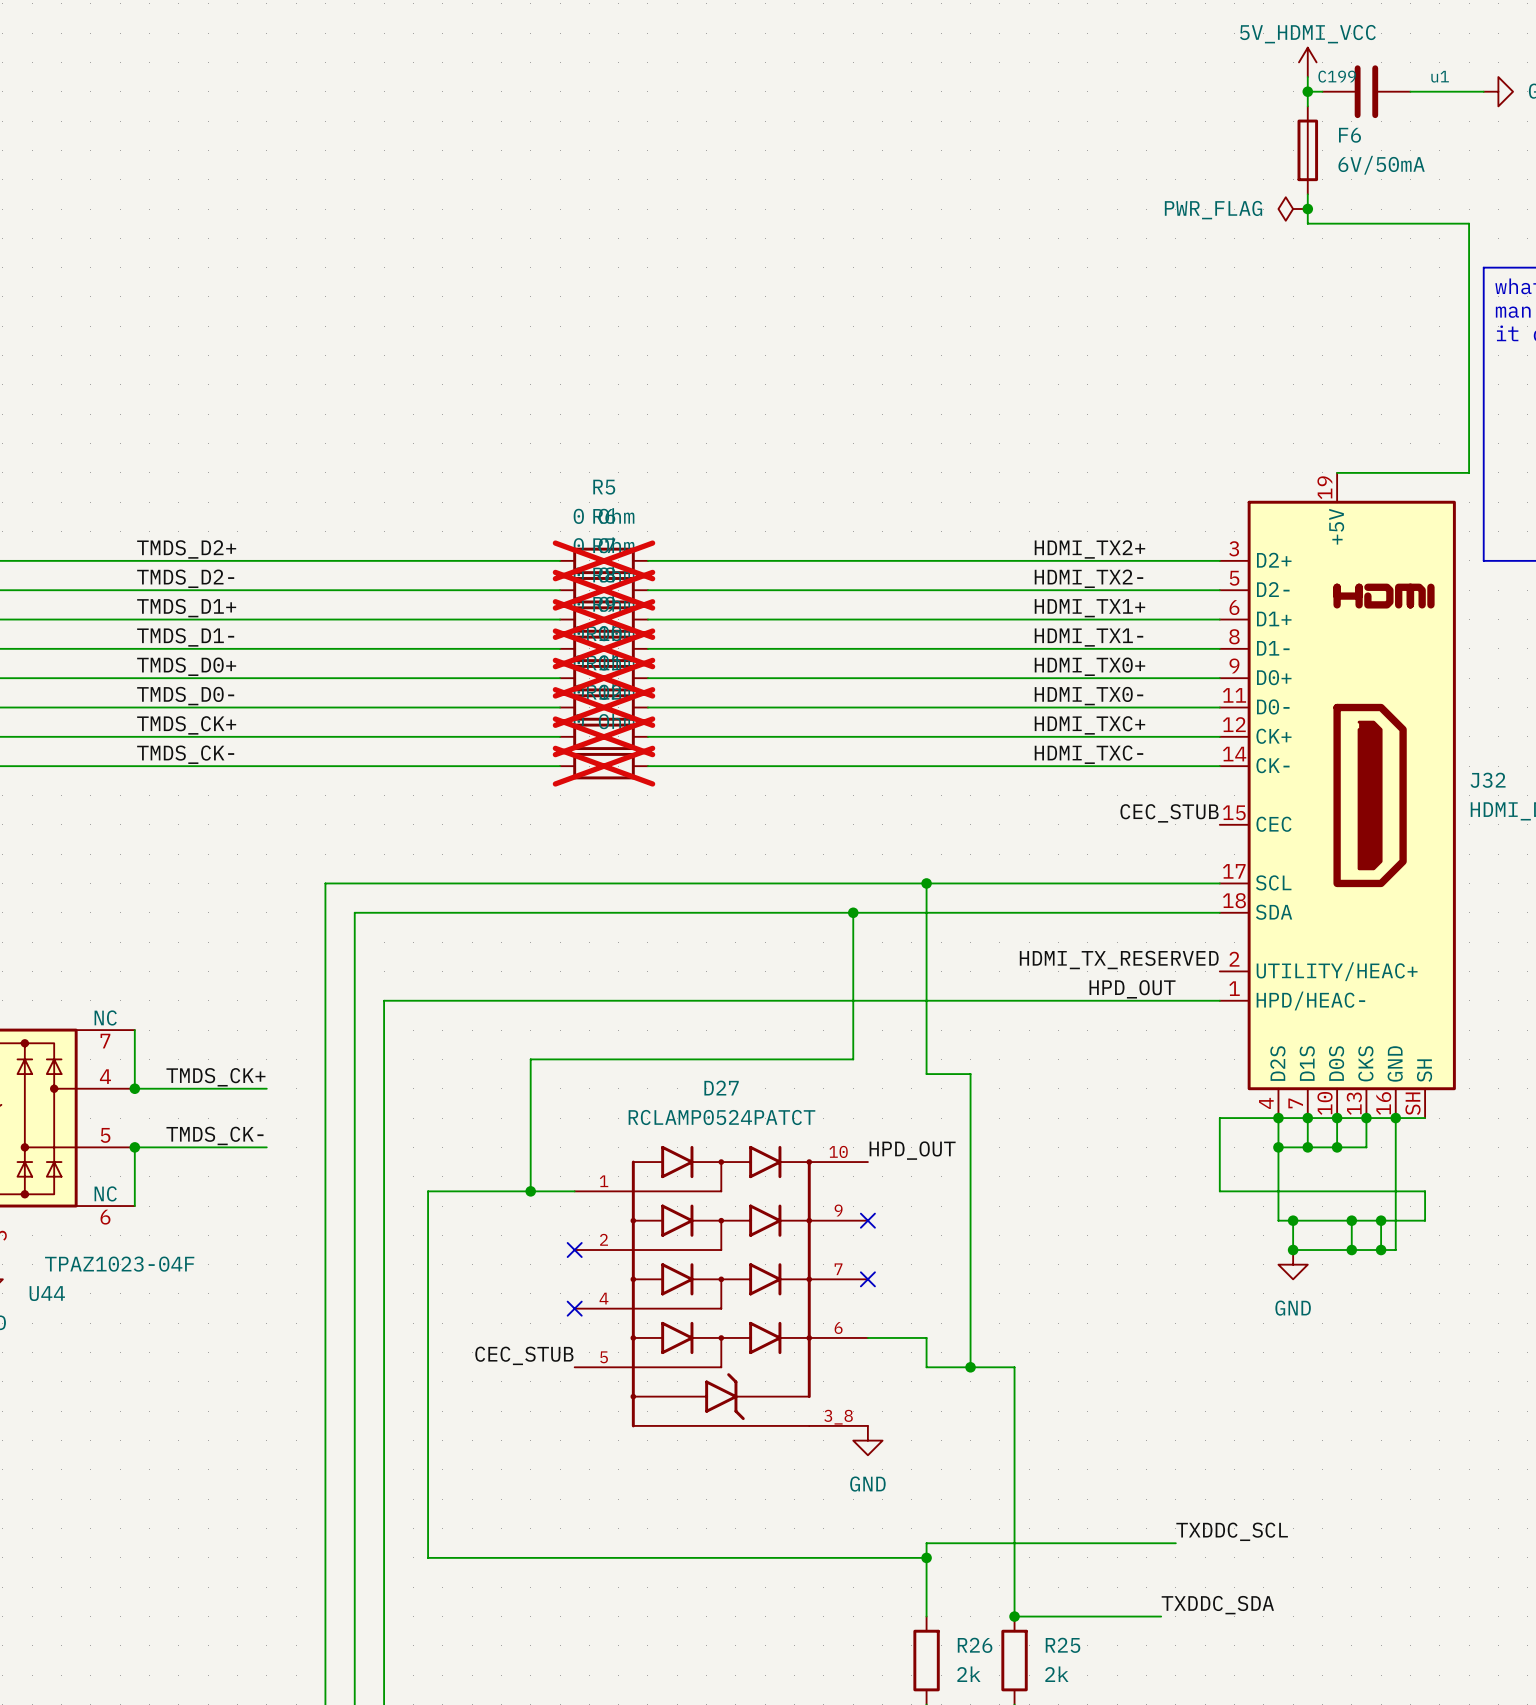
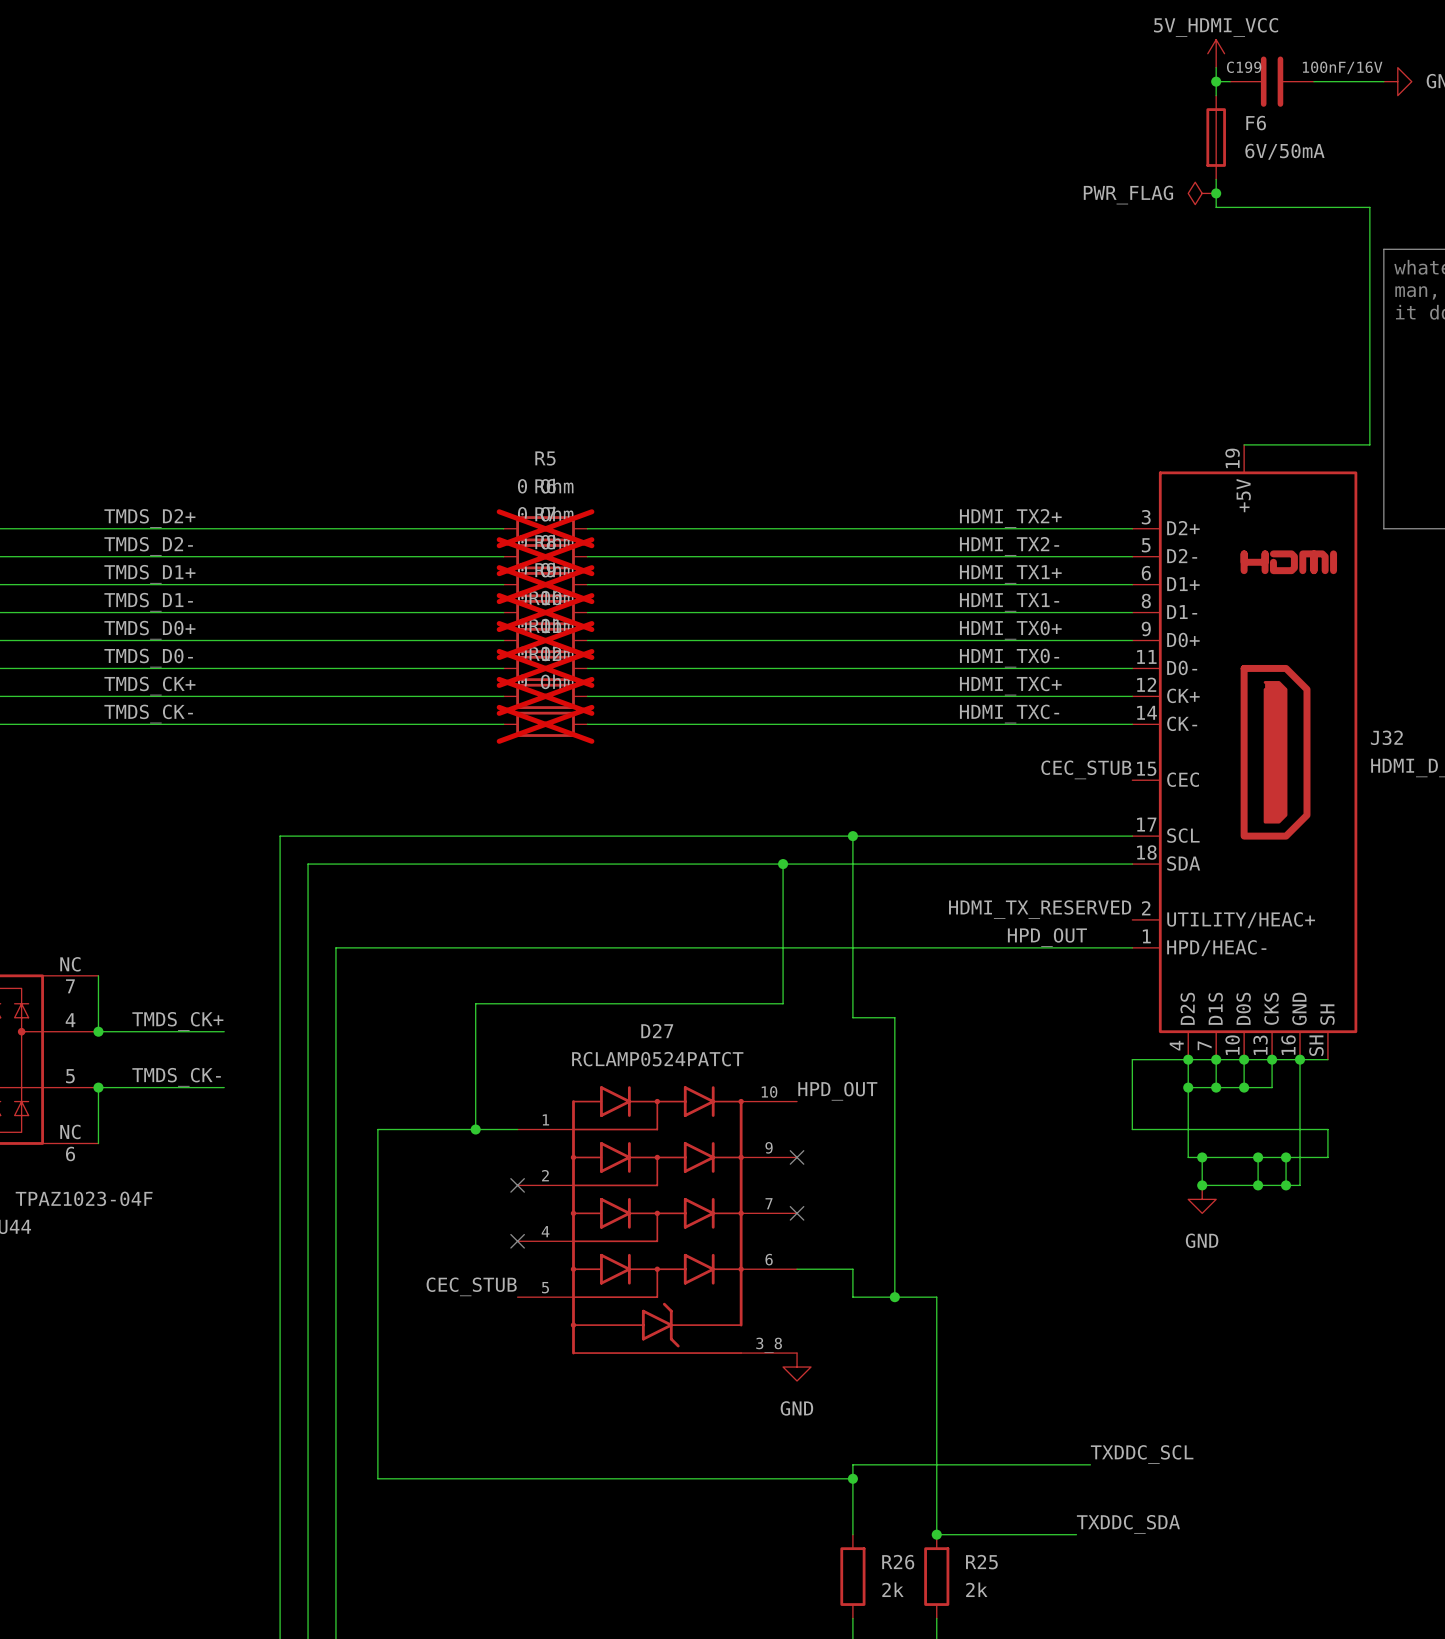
C199 value: u1 (1440, 76) -> 100nF/16V (1342, 67)

